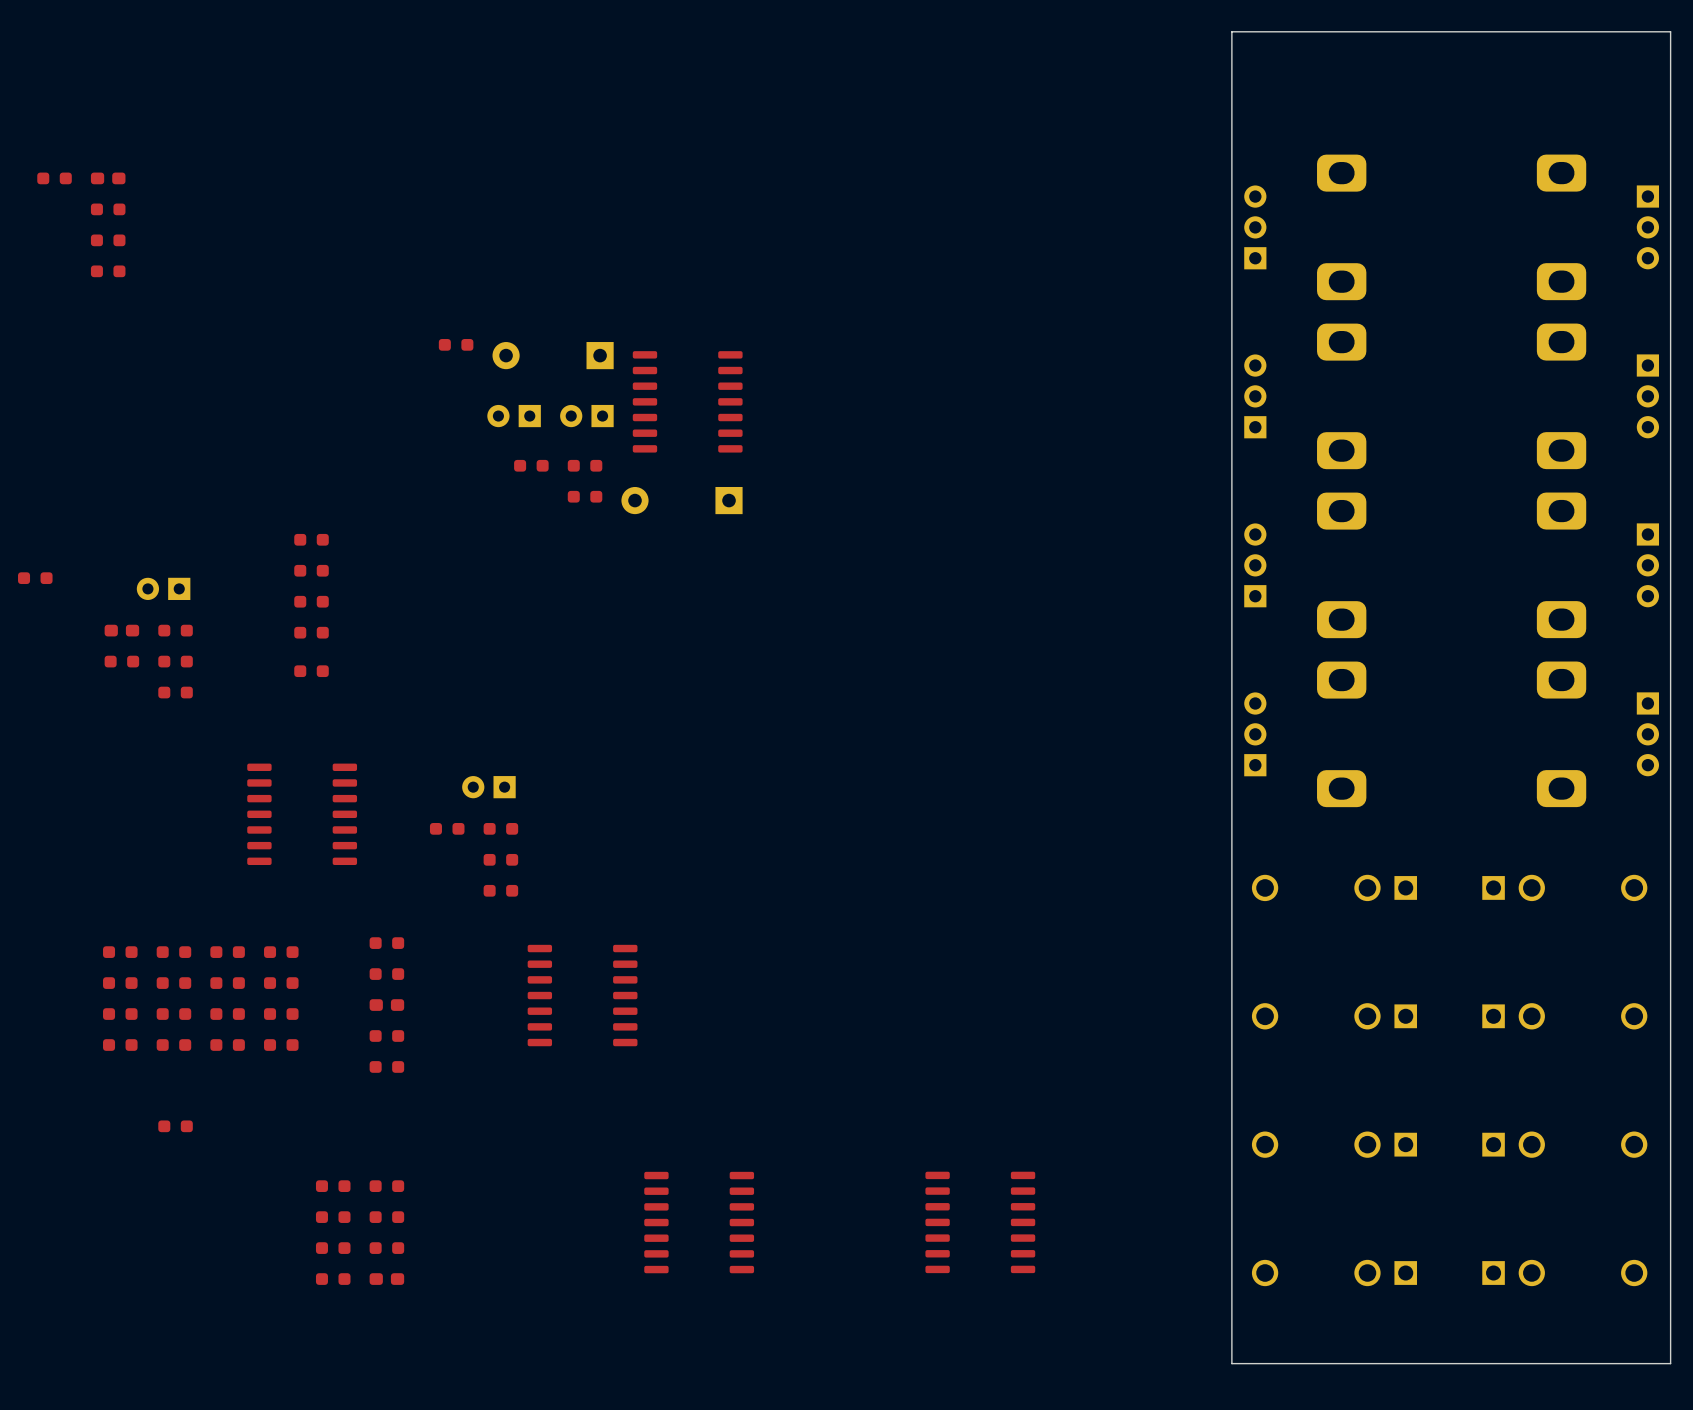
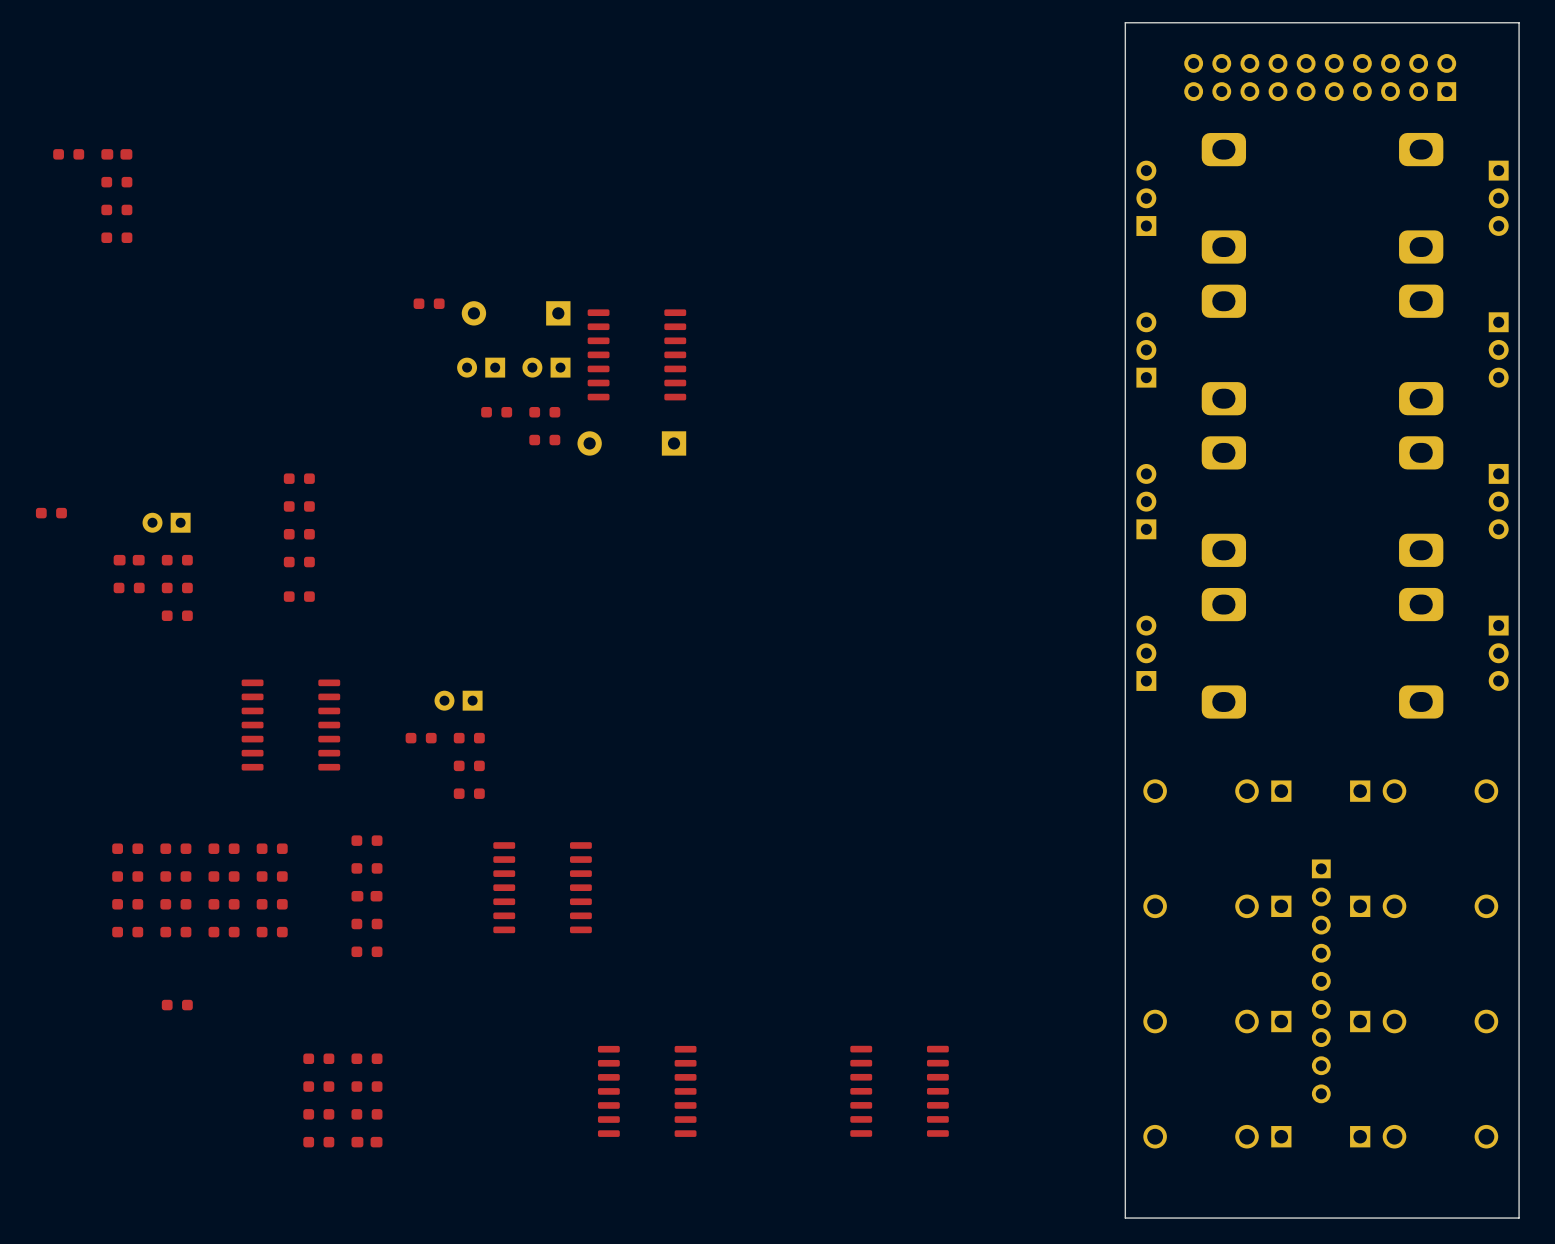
part: none -> (1320, 77)
part: none -> (1321, 981)

